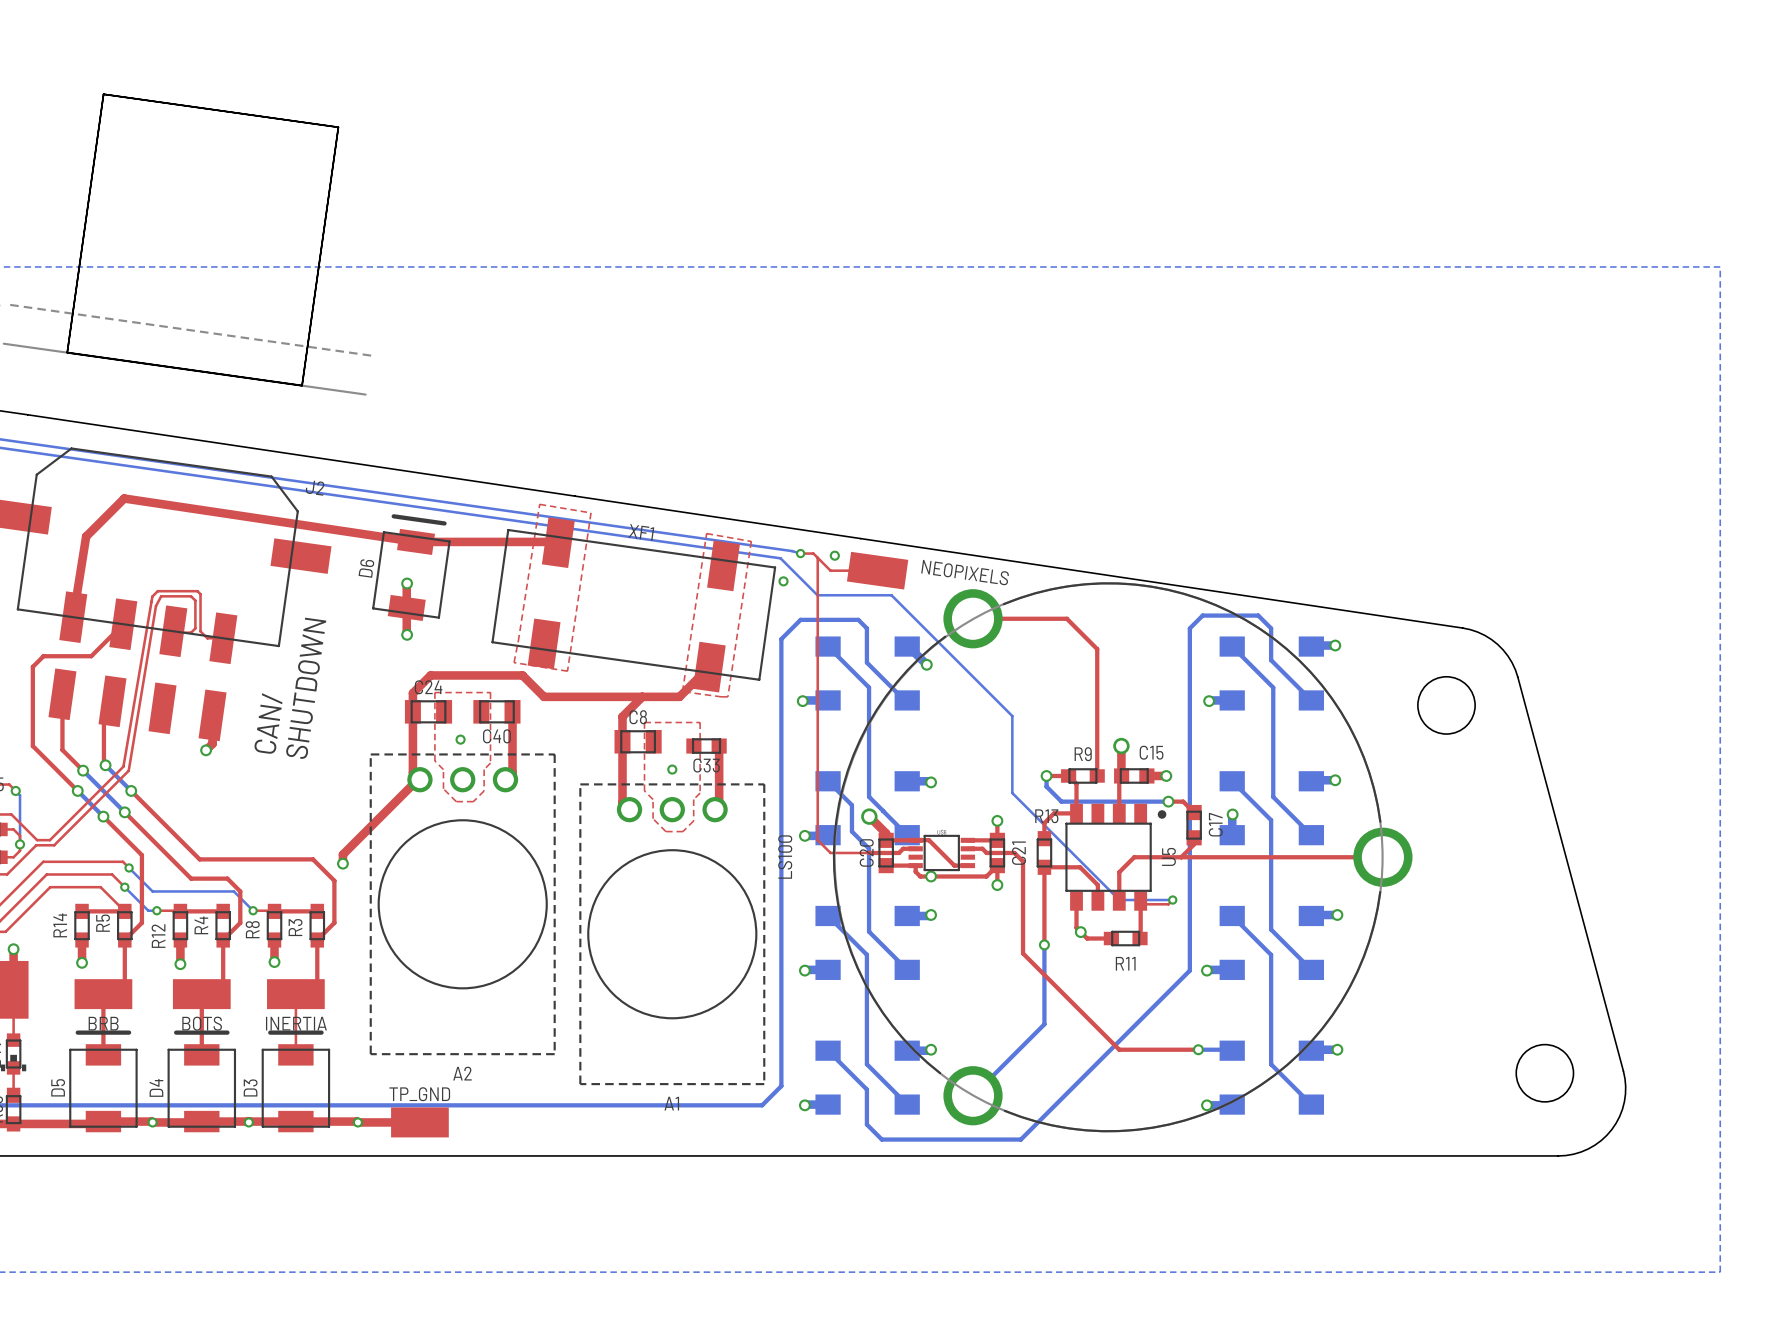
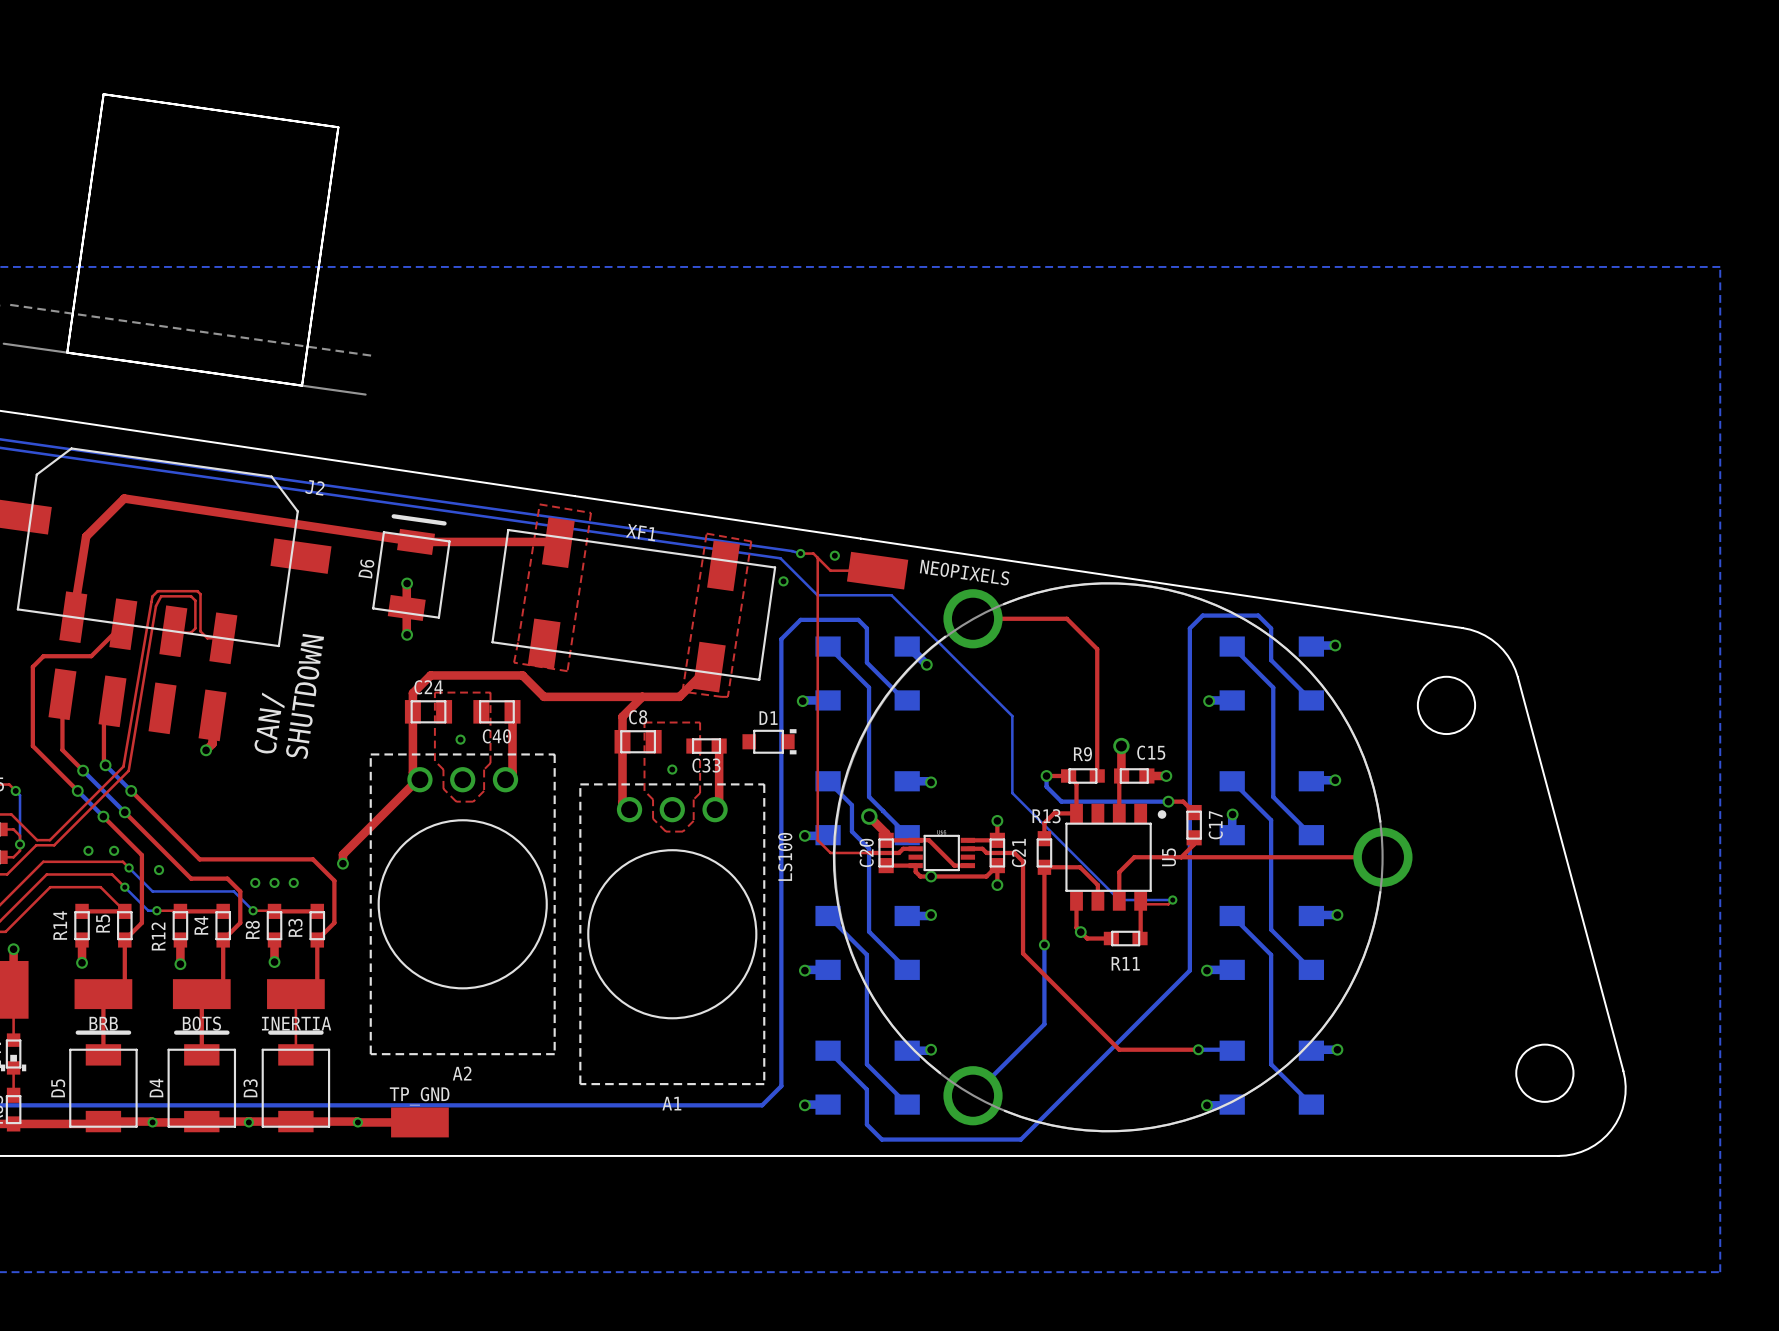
D1: none -> (769, 741)
via: none -> (88, 850)
via: none -> (114, 850)
via: none -> (159, 870)
via: none -> (255, 882)
via: none -> (274, 882)
via: none -> (293, 882)

